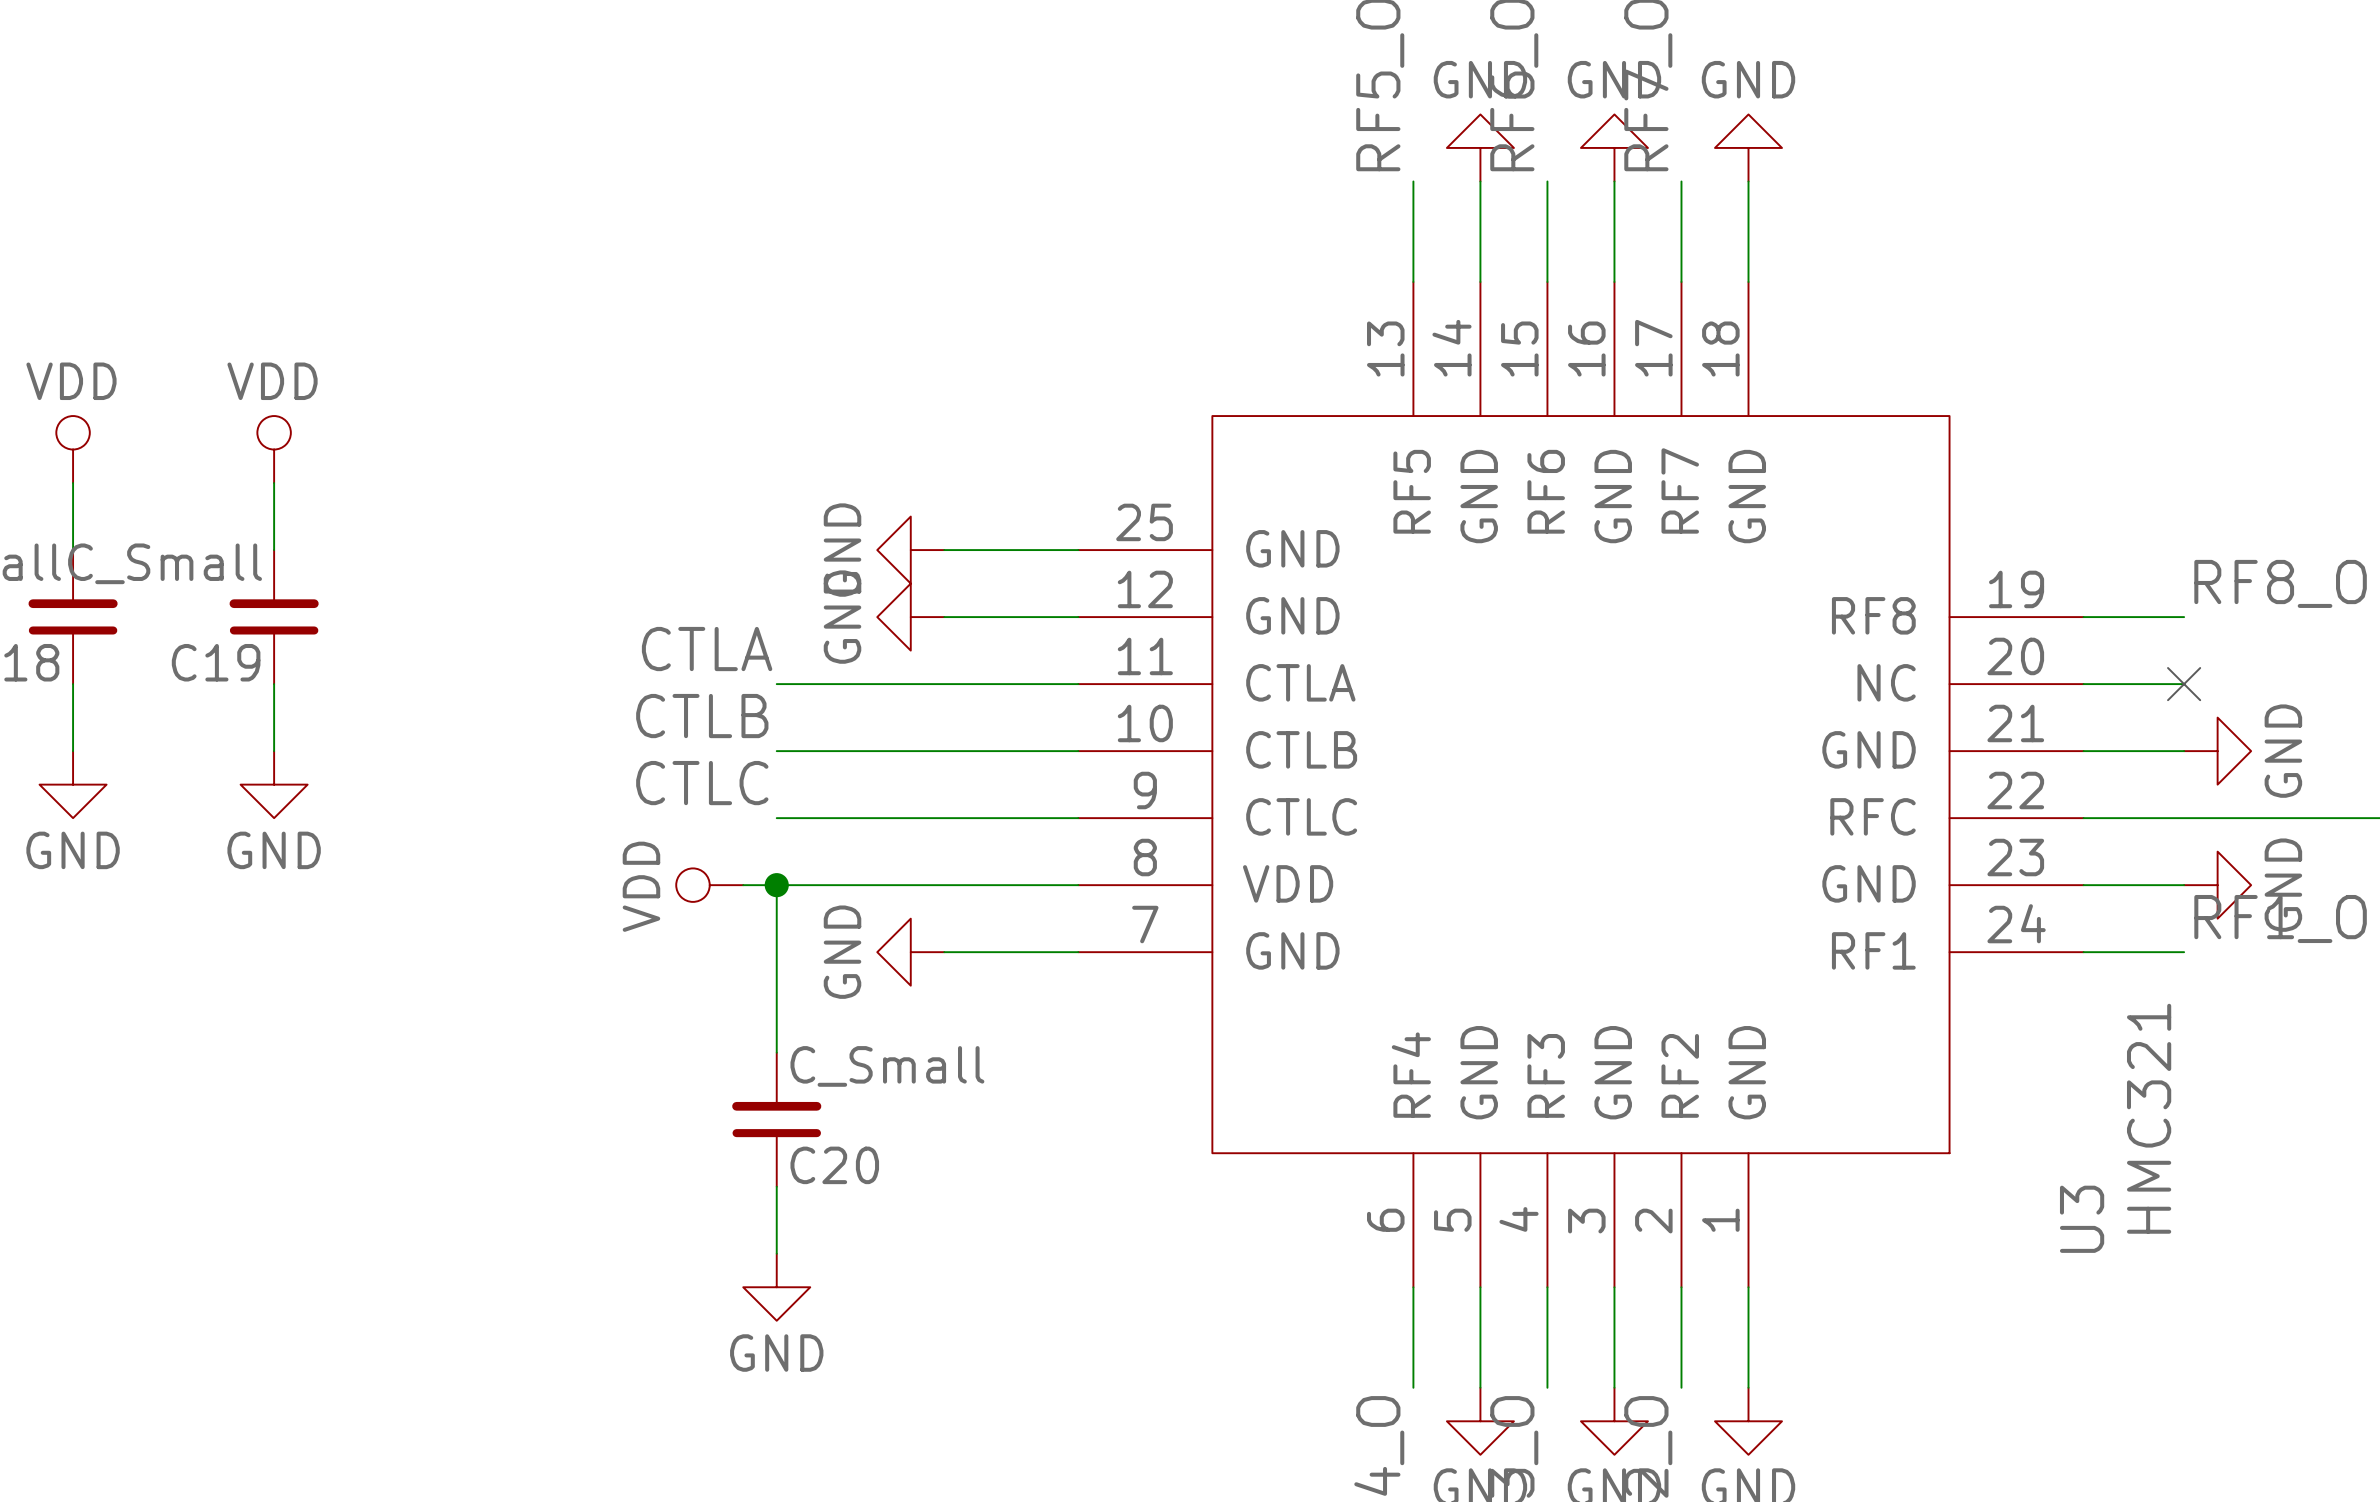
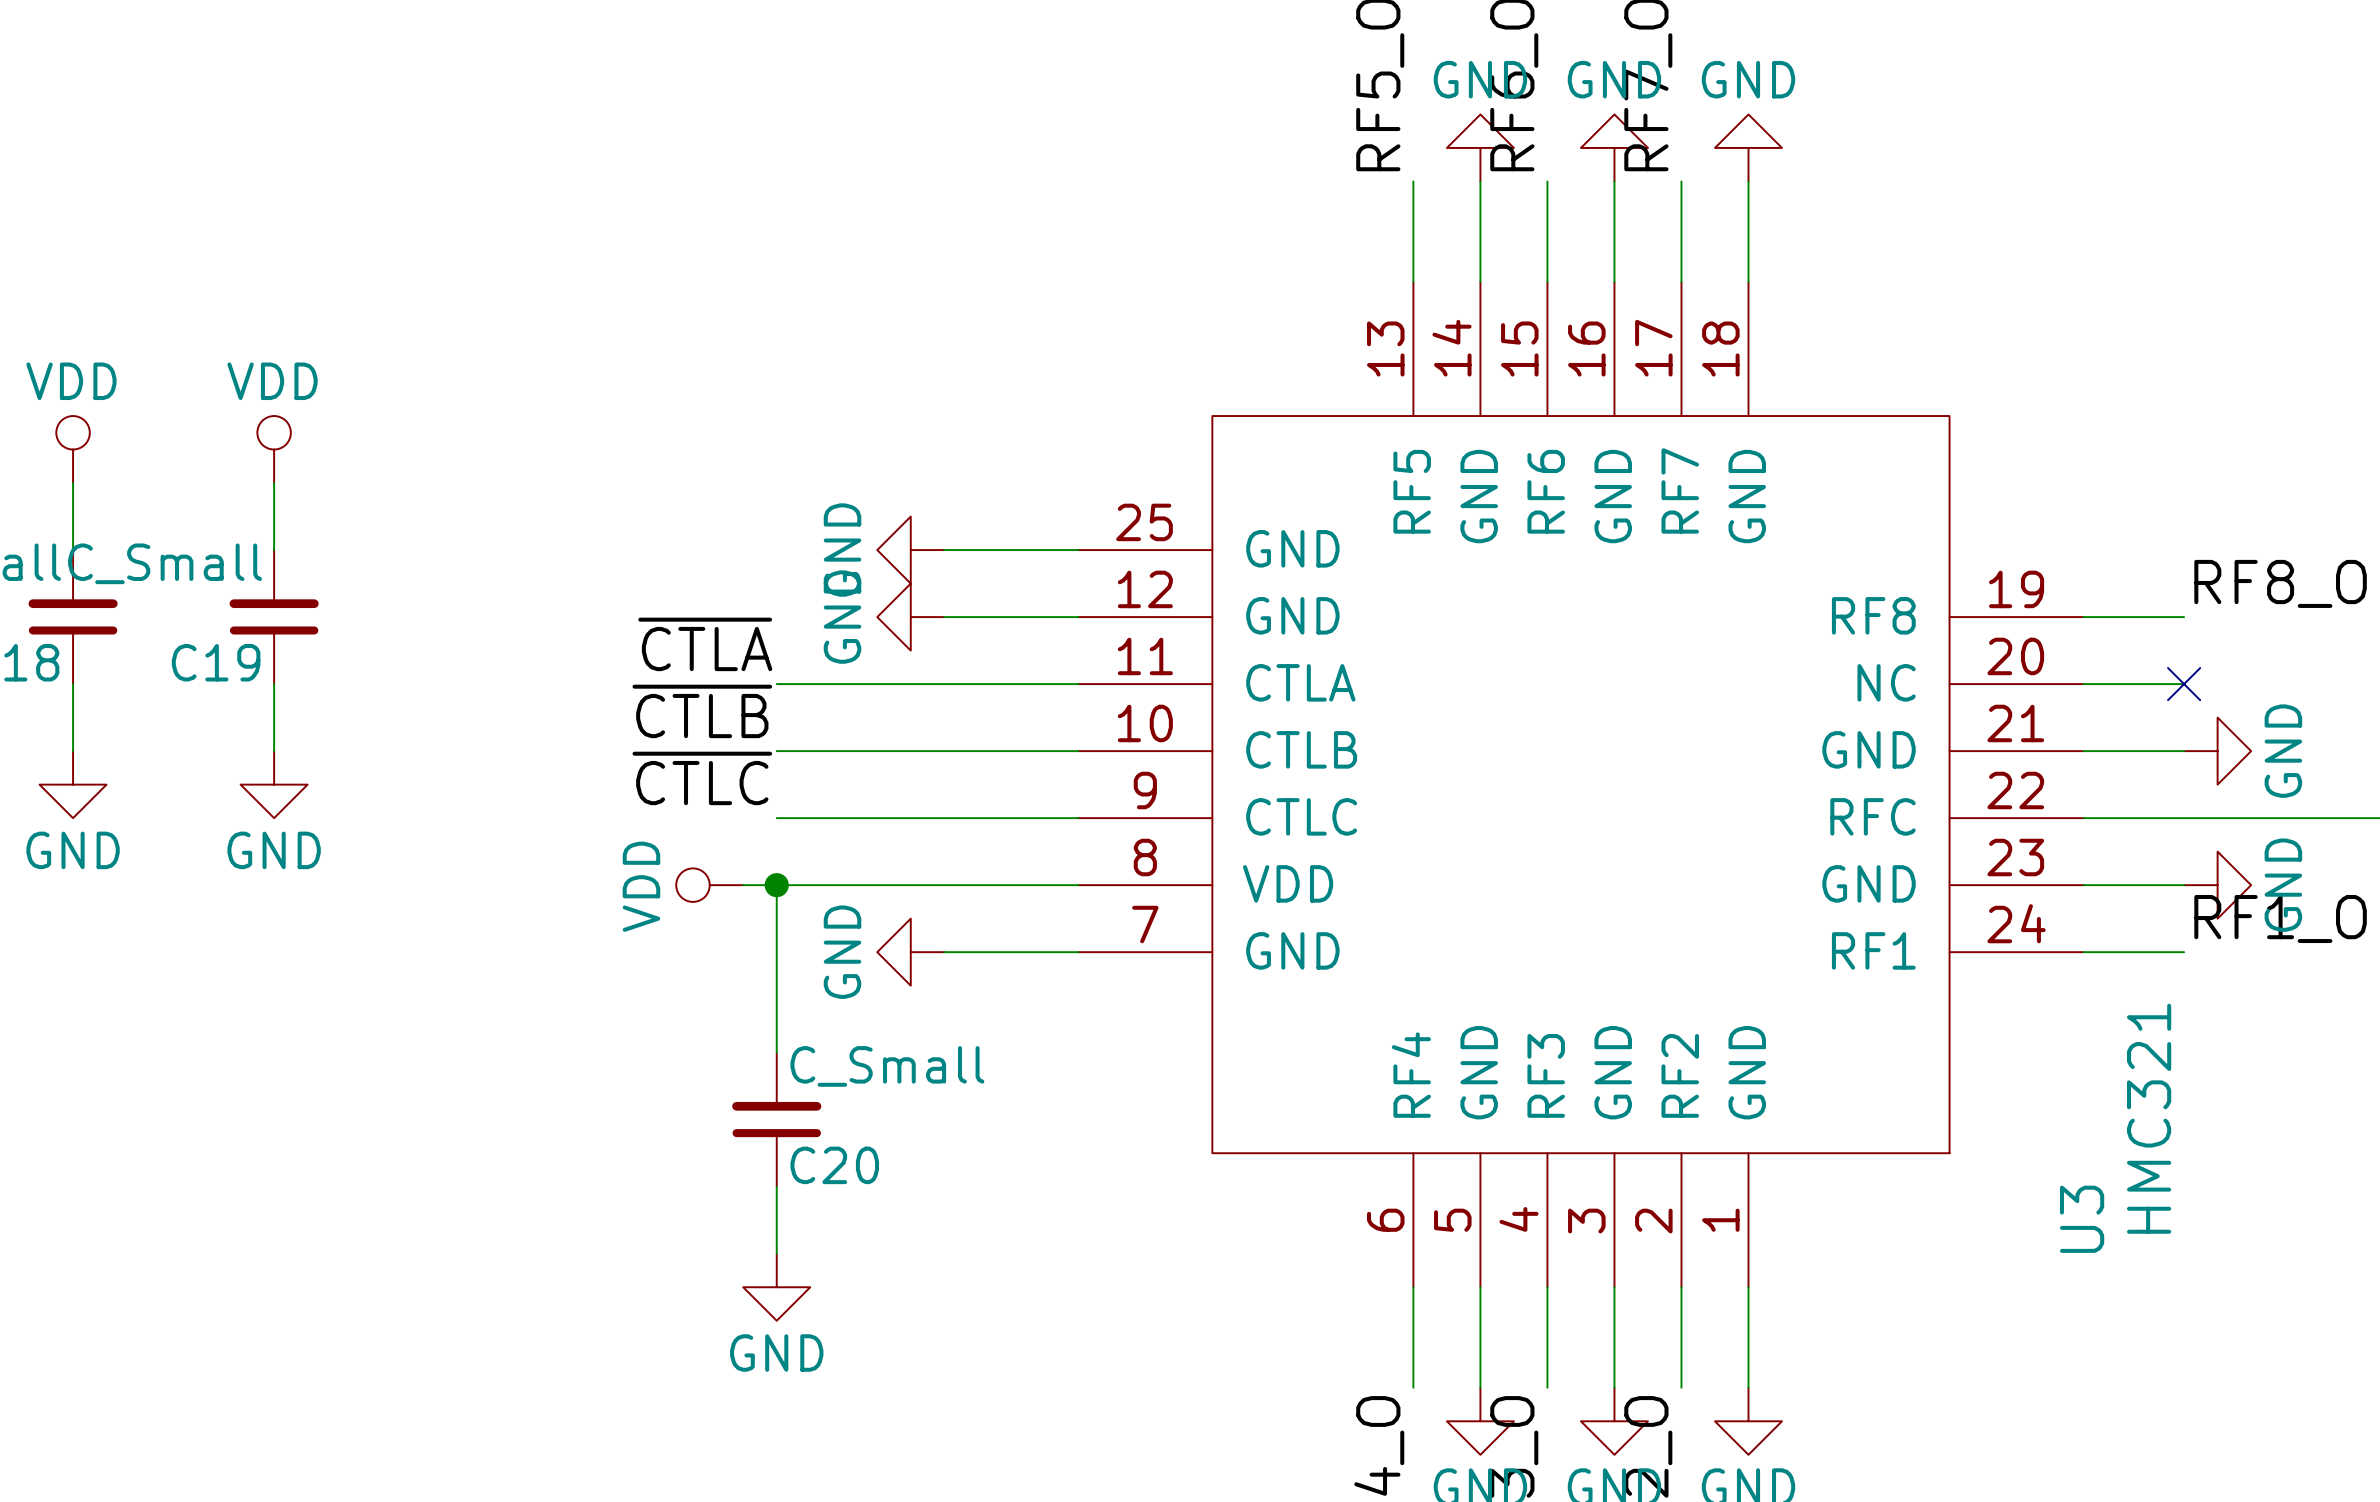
label: CTLA (707, 649) -> ~{CTLA} (705, 644)
label: CTLB (702, 716) -> ~{CTLB} (702, 711)
label: CTLC (702, 783) -> ~{CTLC} (702, 778)

